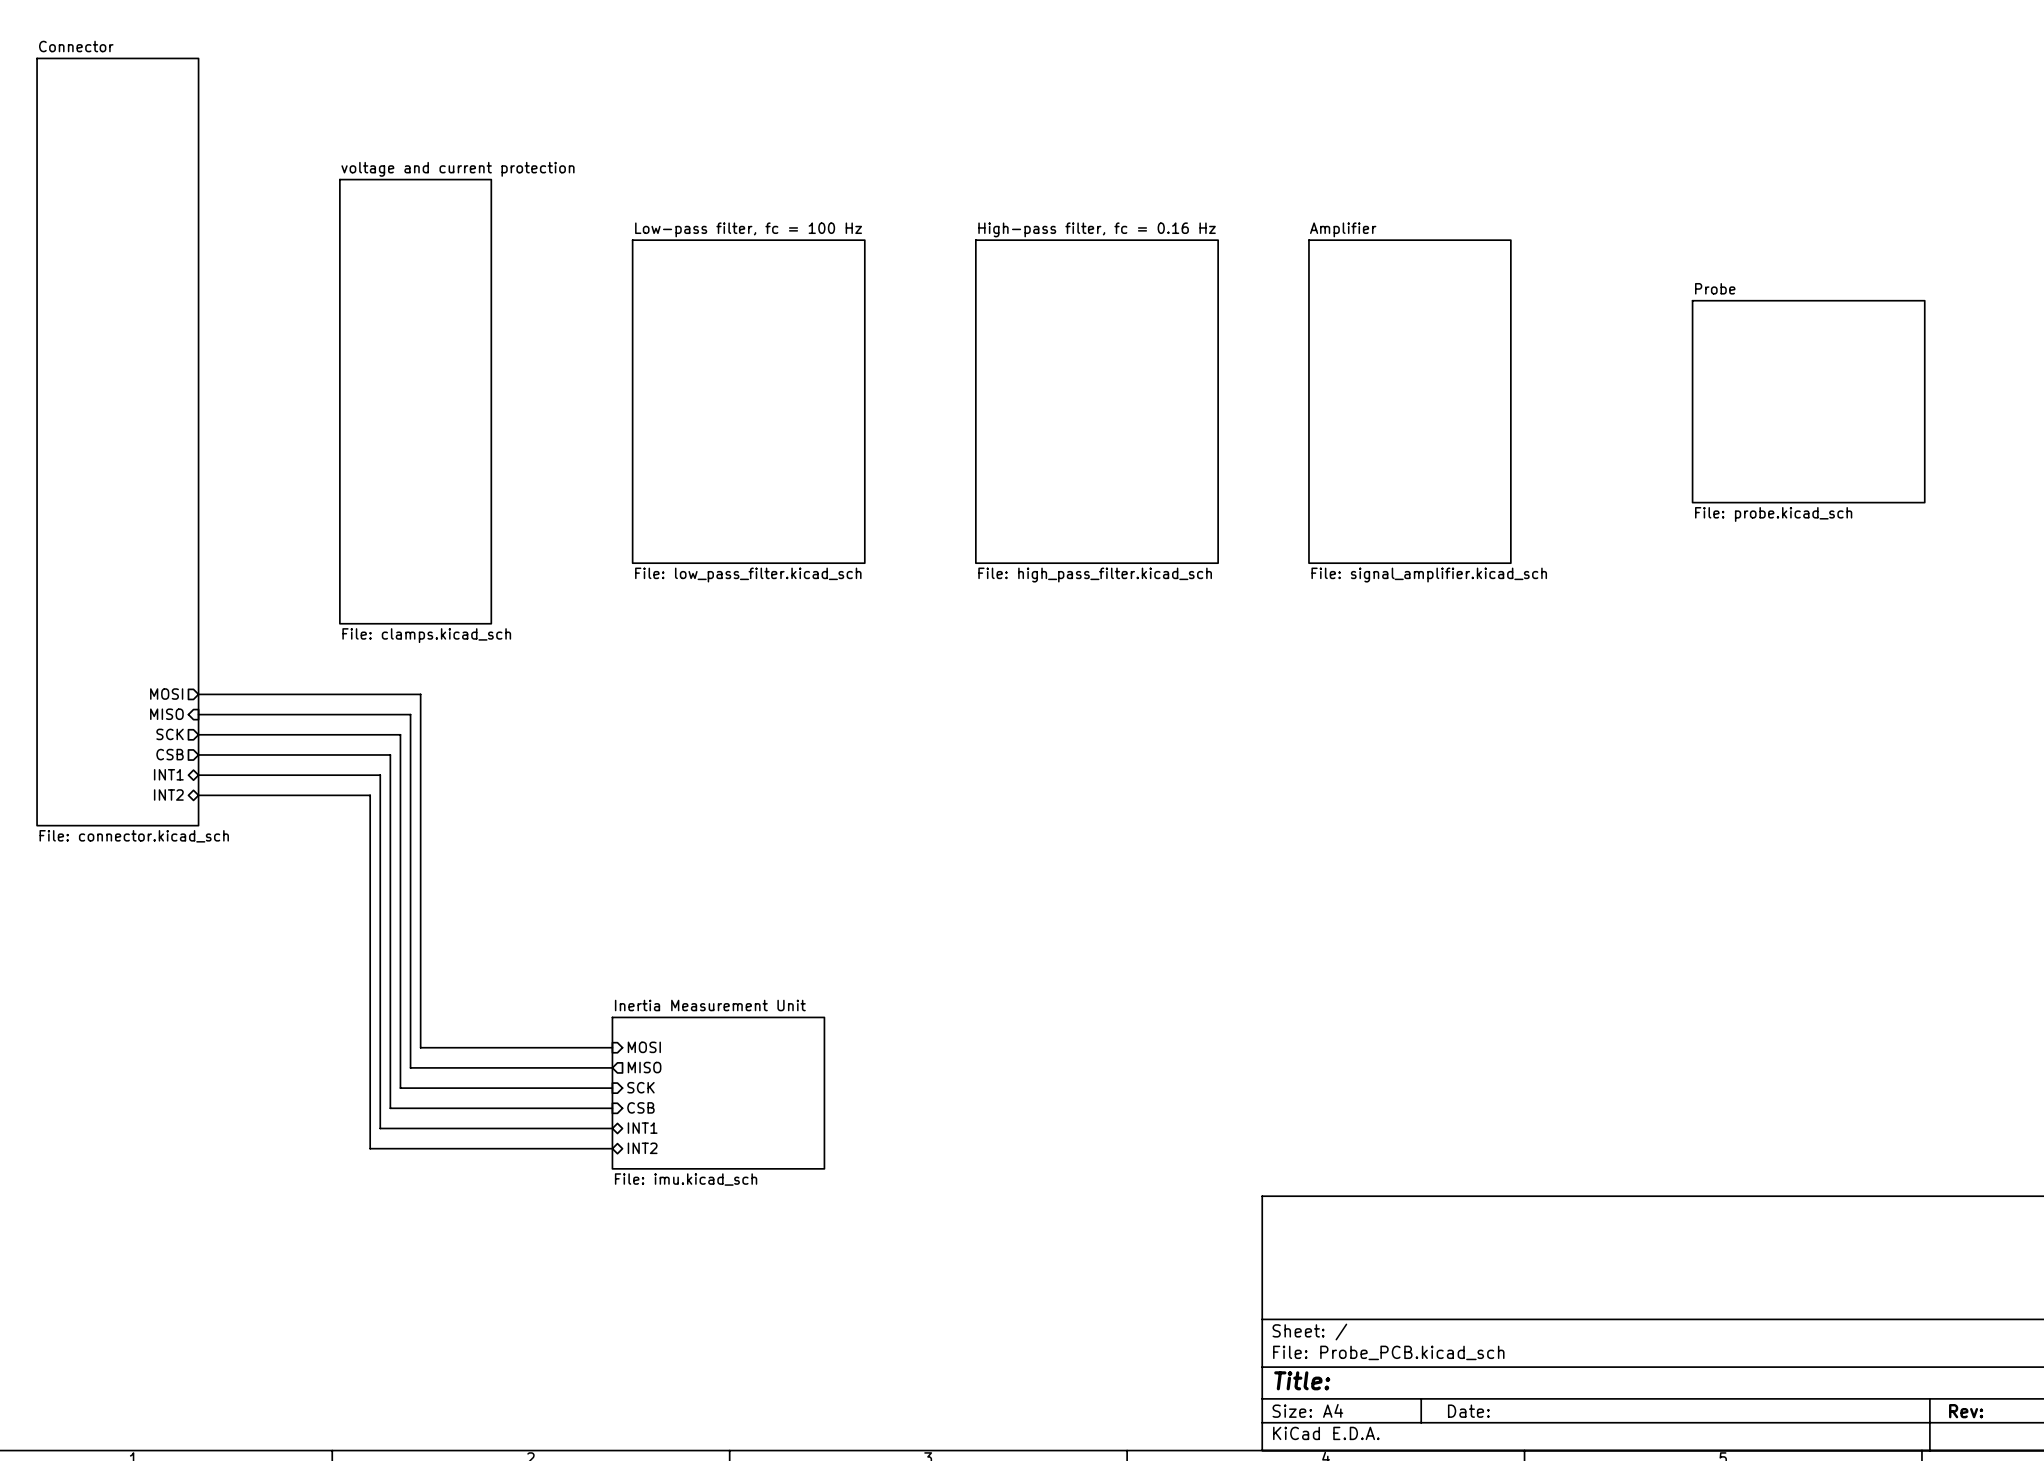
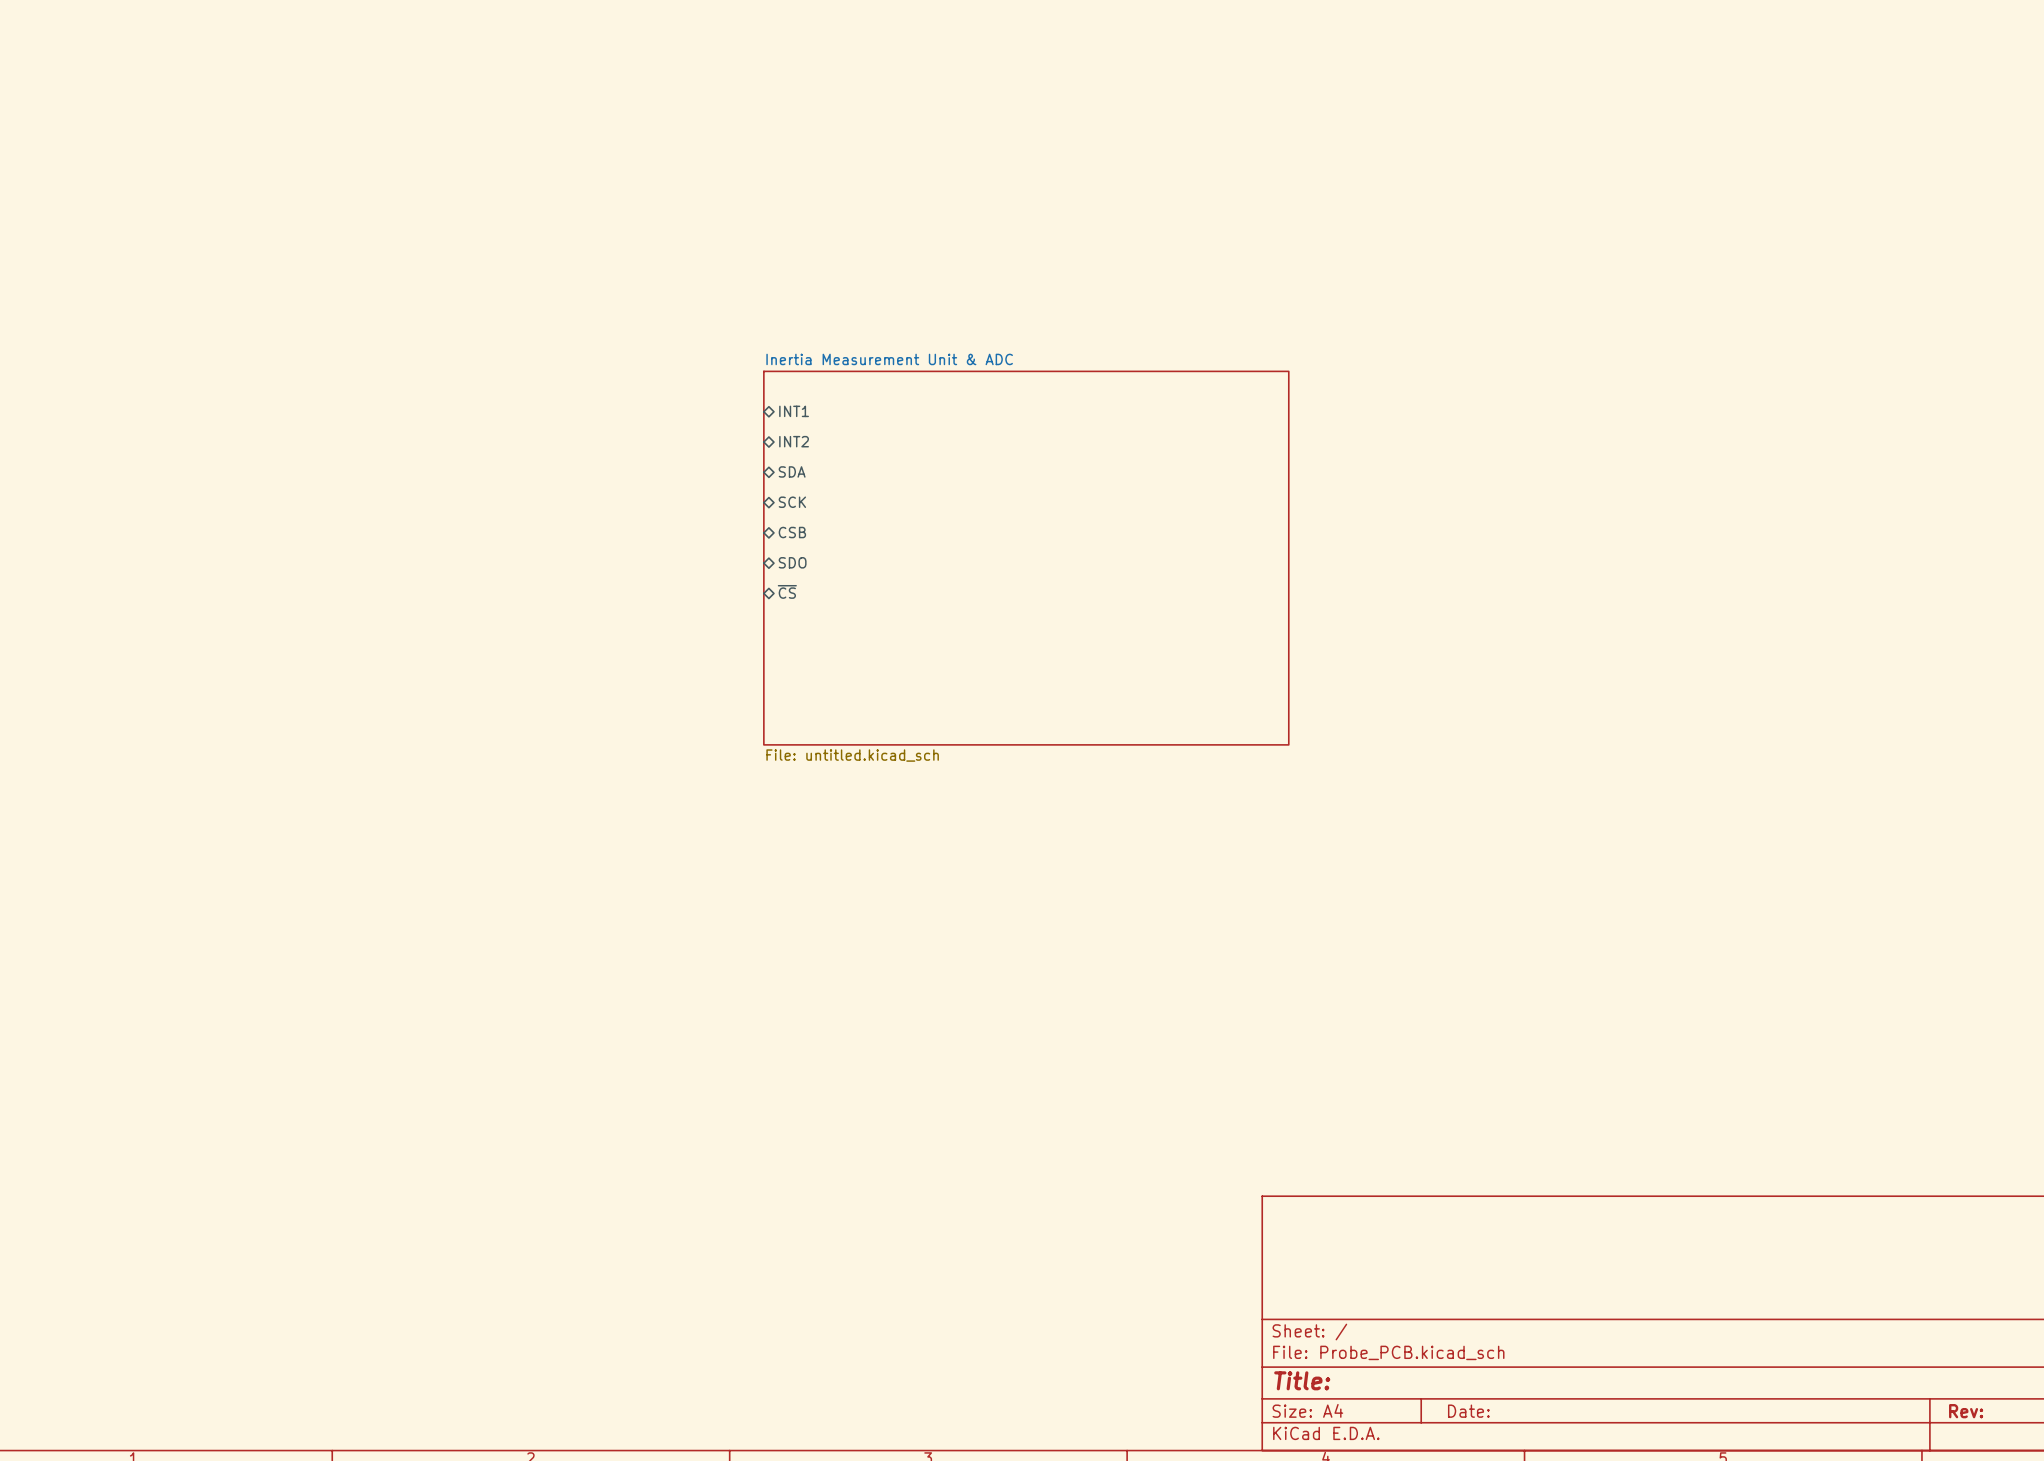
sheet voltage and current protection: File: clamps.kicad_sch (415, 401) -> none
sheet Low-pass filter, fc = 100 Hz: File: low_pass_filter.kicad_sch (748, 401) -> none
sheet High-pass filter, fc = 0.16 Hz: File: high_pass_filter.kicad_sch (1096, 401) -> none
sheet Amplifier: File: signal_amplifier.kicad_sch (1409, 401) -> none
sheet Probe: File: probe.kicad_sch (1808, 401) -> none
sheet pin: none -> INT1 (794, 411)
sheet pin: none -> INT2 (794, 441)
sheet Connector: File: connector.kicad_sch (117, 442) -> none
sheet pin: none -> SDA (792, 471)
sheet pin: none -> SCK (792, 502)
sheet pin: none -> CSB (792, 532)
sheet Inertia Measurement Unit & ADC: none -> File: untitled.kicad_sch (1026, 558)
sheet pin: none -> SDO (792, 562)
sheet pin: none -> ~{CS} (787, 591)
sheet pin: MOSI (166, 694) -> none
wire: (198, 694) (420, 694) (420, 1047) (612, 1047) -> none
sheet pin: MISO (166, 714) -> none
wire: (198, 714) (410, 714) (410, 1067) (612, 1067) -> none
sheet pin: SCK (170, 734) -> none
wire: (198, 734) (400, 734) (400, 1088) (612, 1088) -> none
sheet pin: CSB (170, 754) -> none
wire: (198, 754) (390, 754) (390, 1108) (612, 1108) -> none
sheet pin: INT1 (168, 774) -> none
wire: (198, 775) (380, 775) (380, 1128) (612, 1128) -> none
sheet pin: INT2 (168, 794) -> none
wire: (198, 795) (370, 795) (370, 1148) (612, 1148) -> none
sheet pin: MOSI (644, 1047) -> none
sheet pin: MISO (644, 1067) -> none
sheet pin: SCK (640, 1087) -> none
sheet Inertia Measurement Unit: File: imu.kicad_sch (718, 1093) -> none
sheet pin: CSB (640, 1107) -> none
sheet pin: INT1 (642, 1128) -> none
sheet pin: INT2 (642, 1148) -> none

